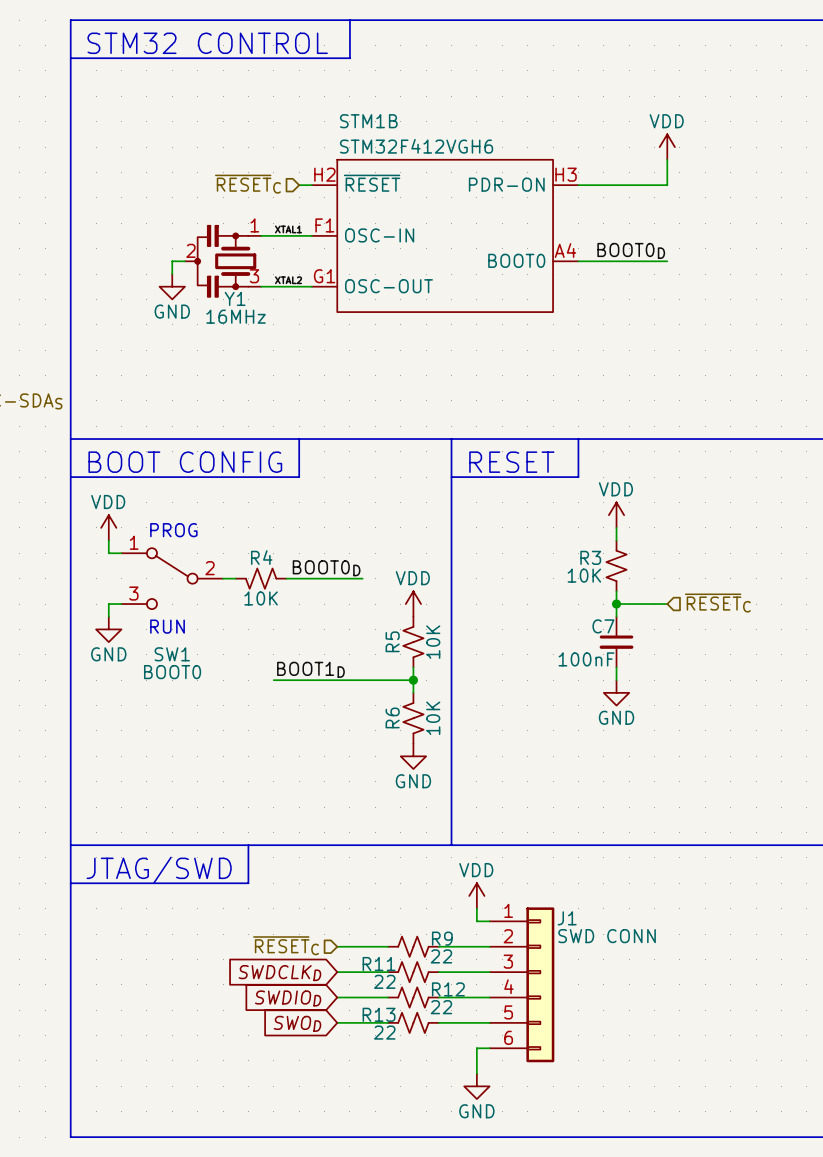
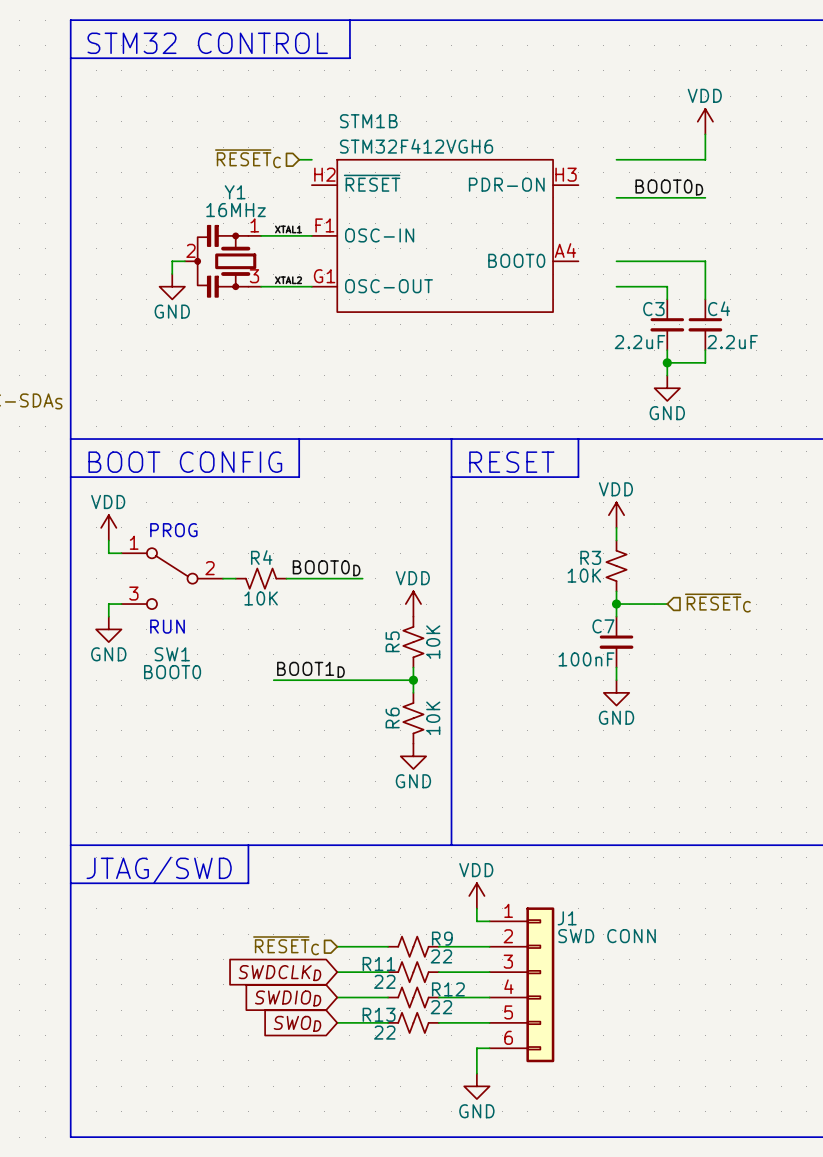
power symbol position: VDD (667, 147) -> VDD (705, 121)
wire: (667, 159) (667, 185) (578, 185) -> (705, 134) (705, 159) (616, 159)
hierarchical label position: ~{RESET}C (247, 184) -> ~{RESET}C (247, 158)
wire: (299, 185) (311, 185) -> (299, 159) (311, 159)
wire: none -> (616, 197) (705, 197)
label position: BOOT0D (631, 250) -> BOOT0D (669, 187)
wire: (578, 261) (616, 261) -> none
wire: none -> (667, 261) (705, 261) (705, 299)
wire: none -> (616, 286) (667, 286) (667, 299)
Y1 name position: Y1 (235, 298) -> Y1 (235, 192)
Y1 value position: 16MHz (236, 316) -> 16MHz (236, 210)
C3: none -> 2.2uF (667, 324)
C4: none -> 2.2uF (705, 324)
wire: none -> (667, 350) (667, 375)
wire: none -> (705, 350) (705, 362) (667, 362)
junction: none -> (667, 362)
power symbol: none -> GND (667, 388)

